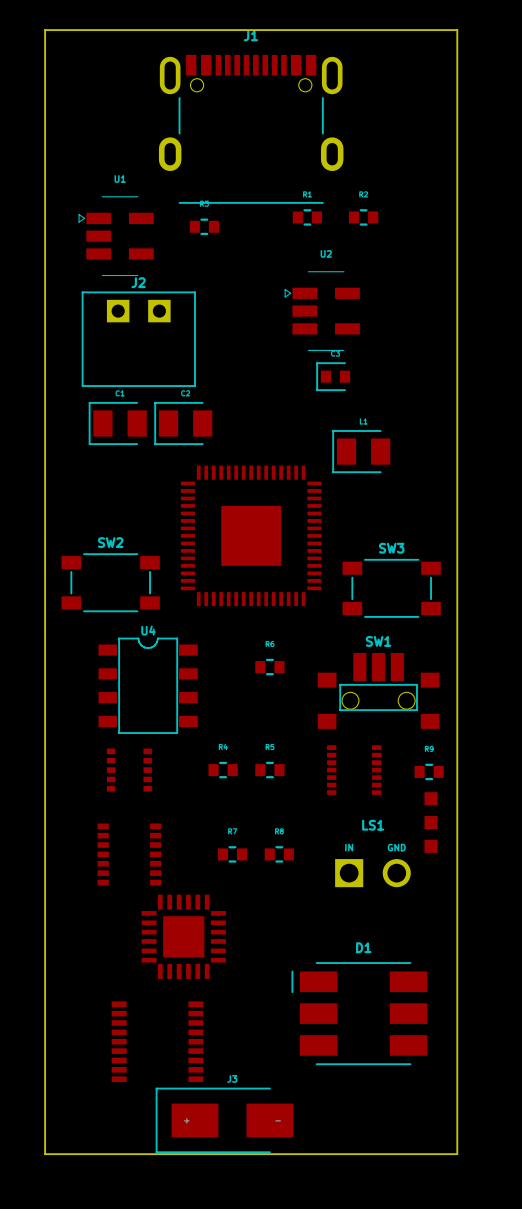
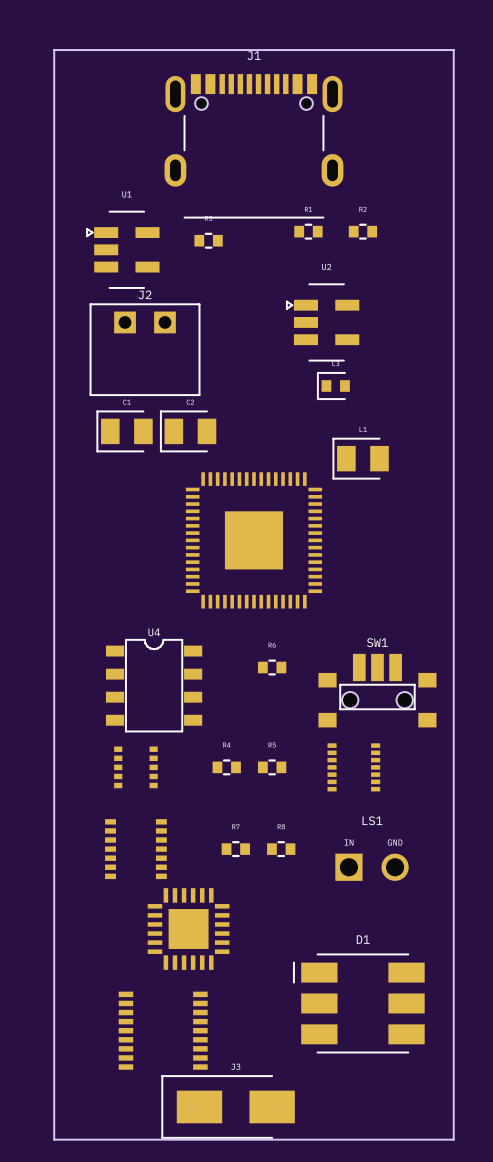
SW2: (110, 582) -> none
SW3: (391, 588) -> none
part: (429, 771) -> none
part: (431, 822) -> none

